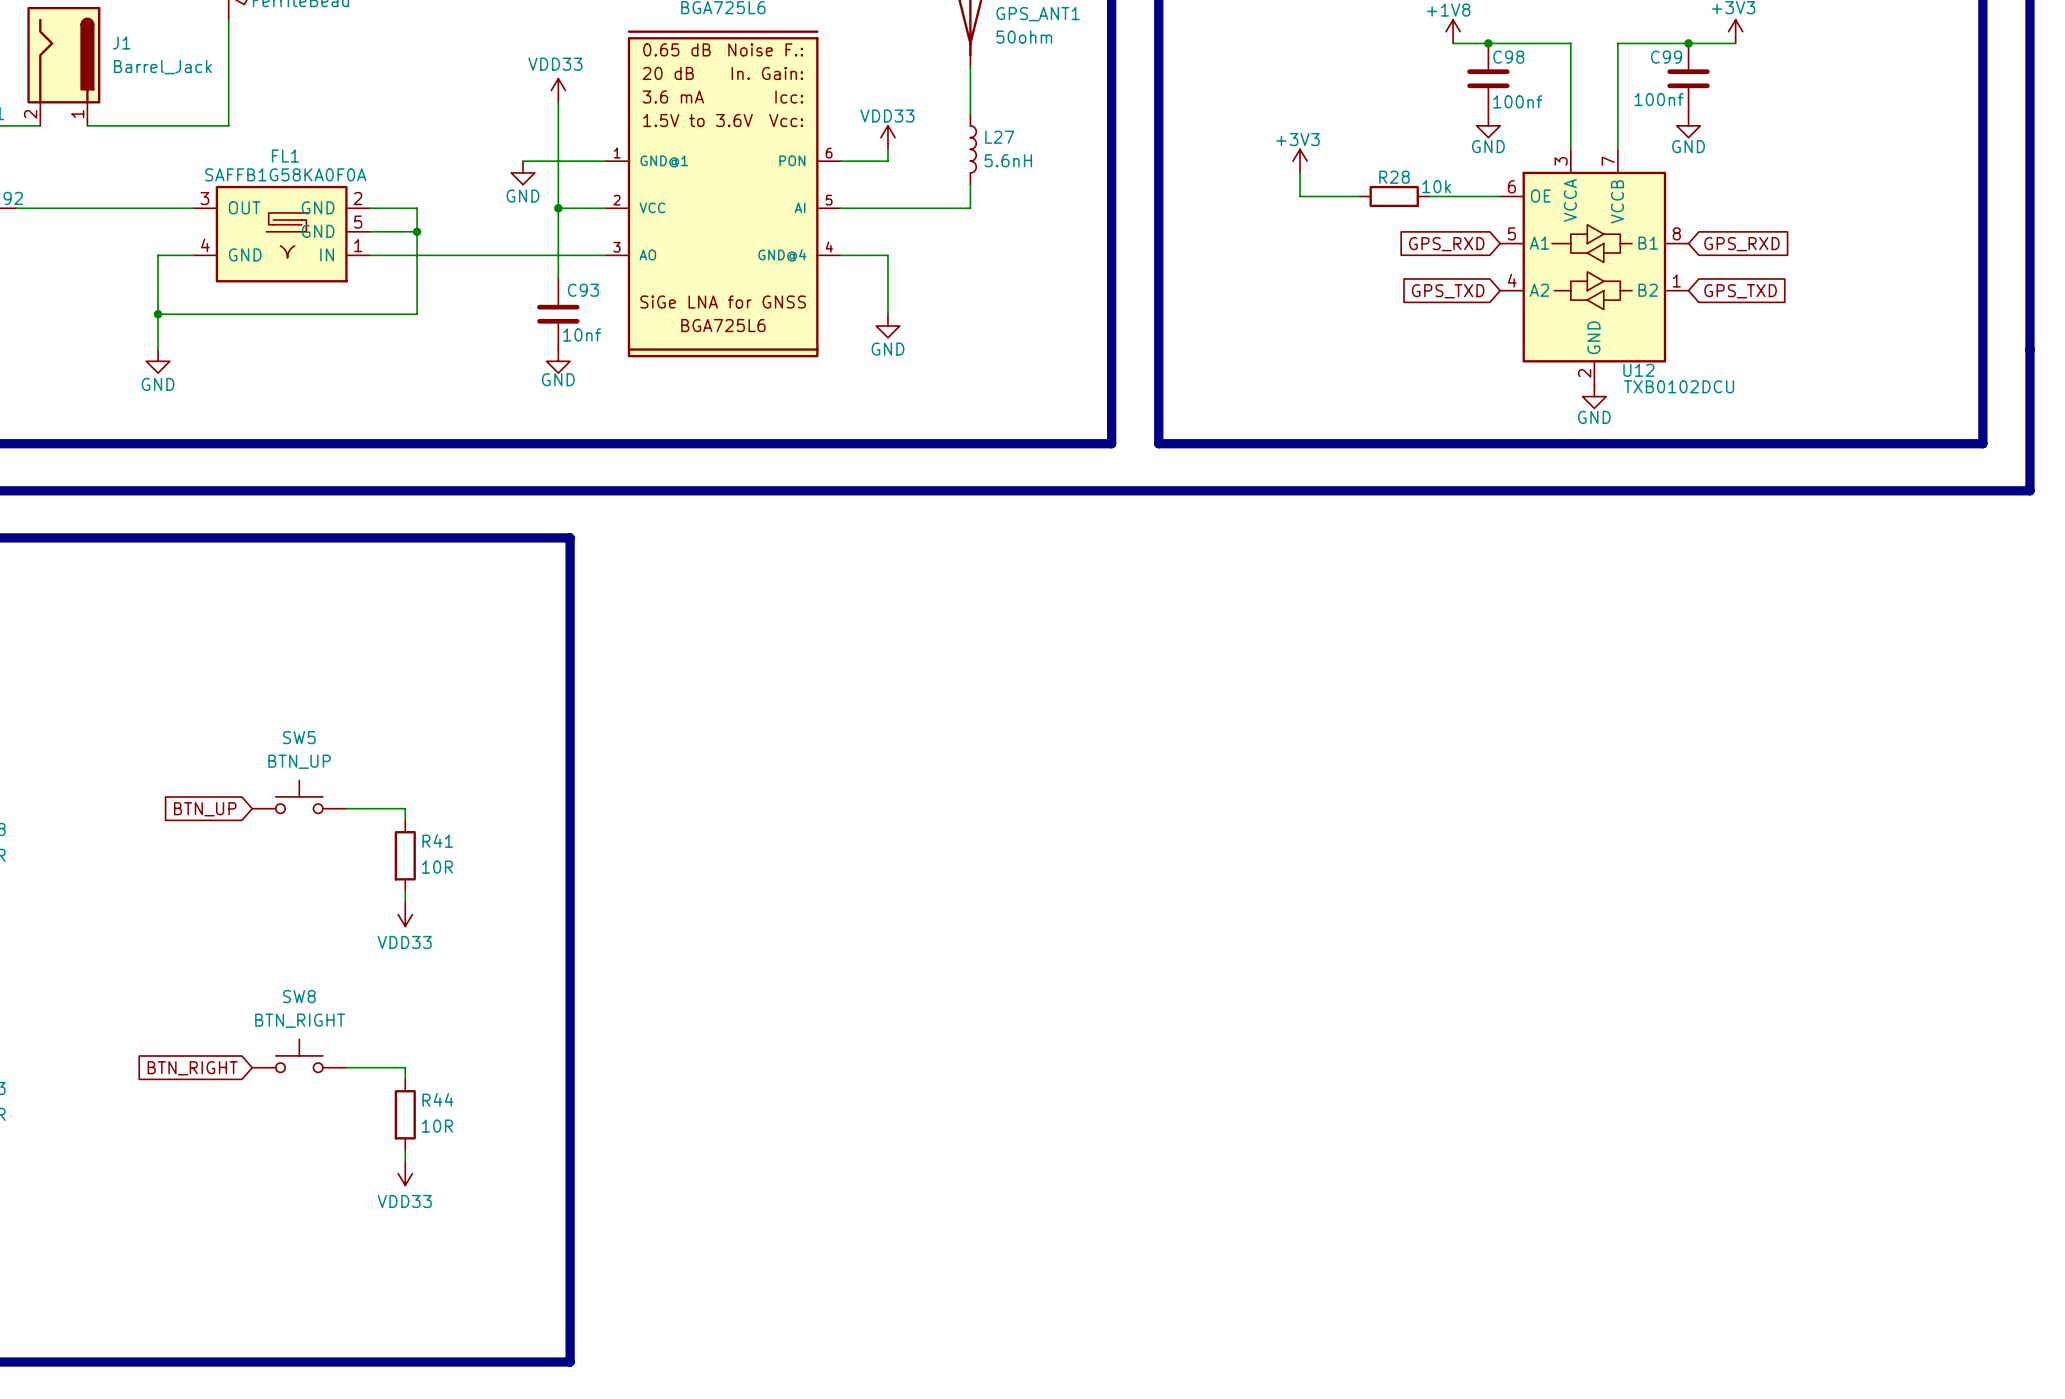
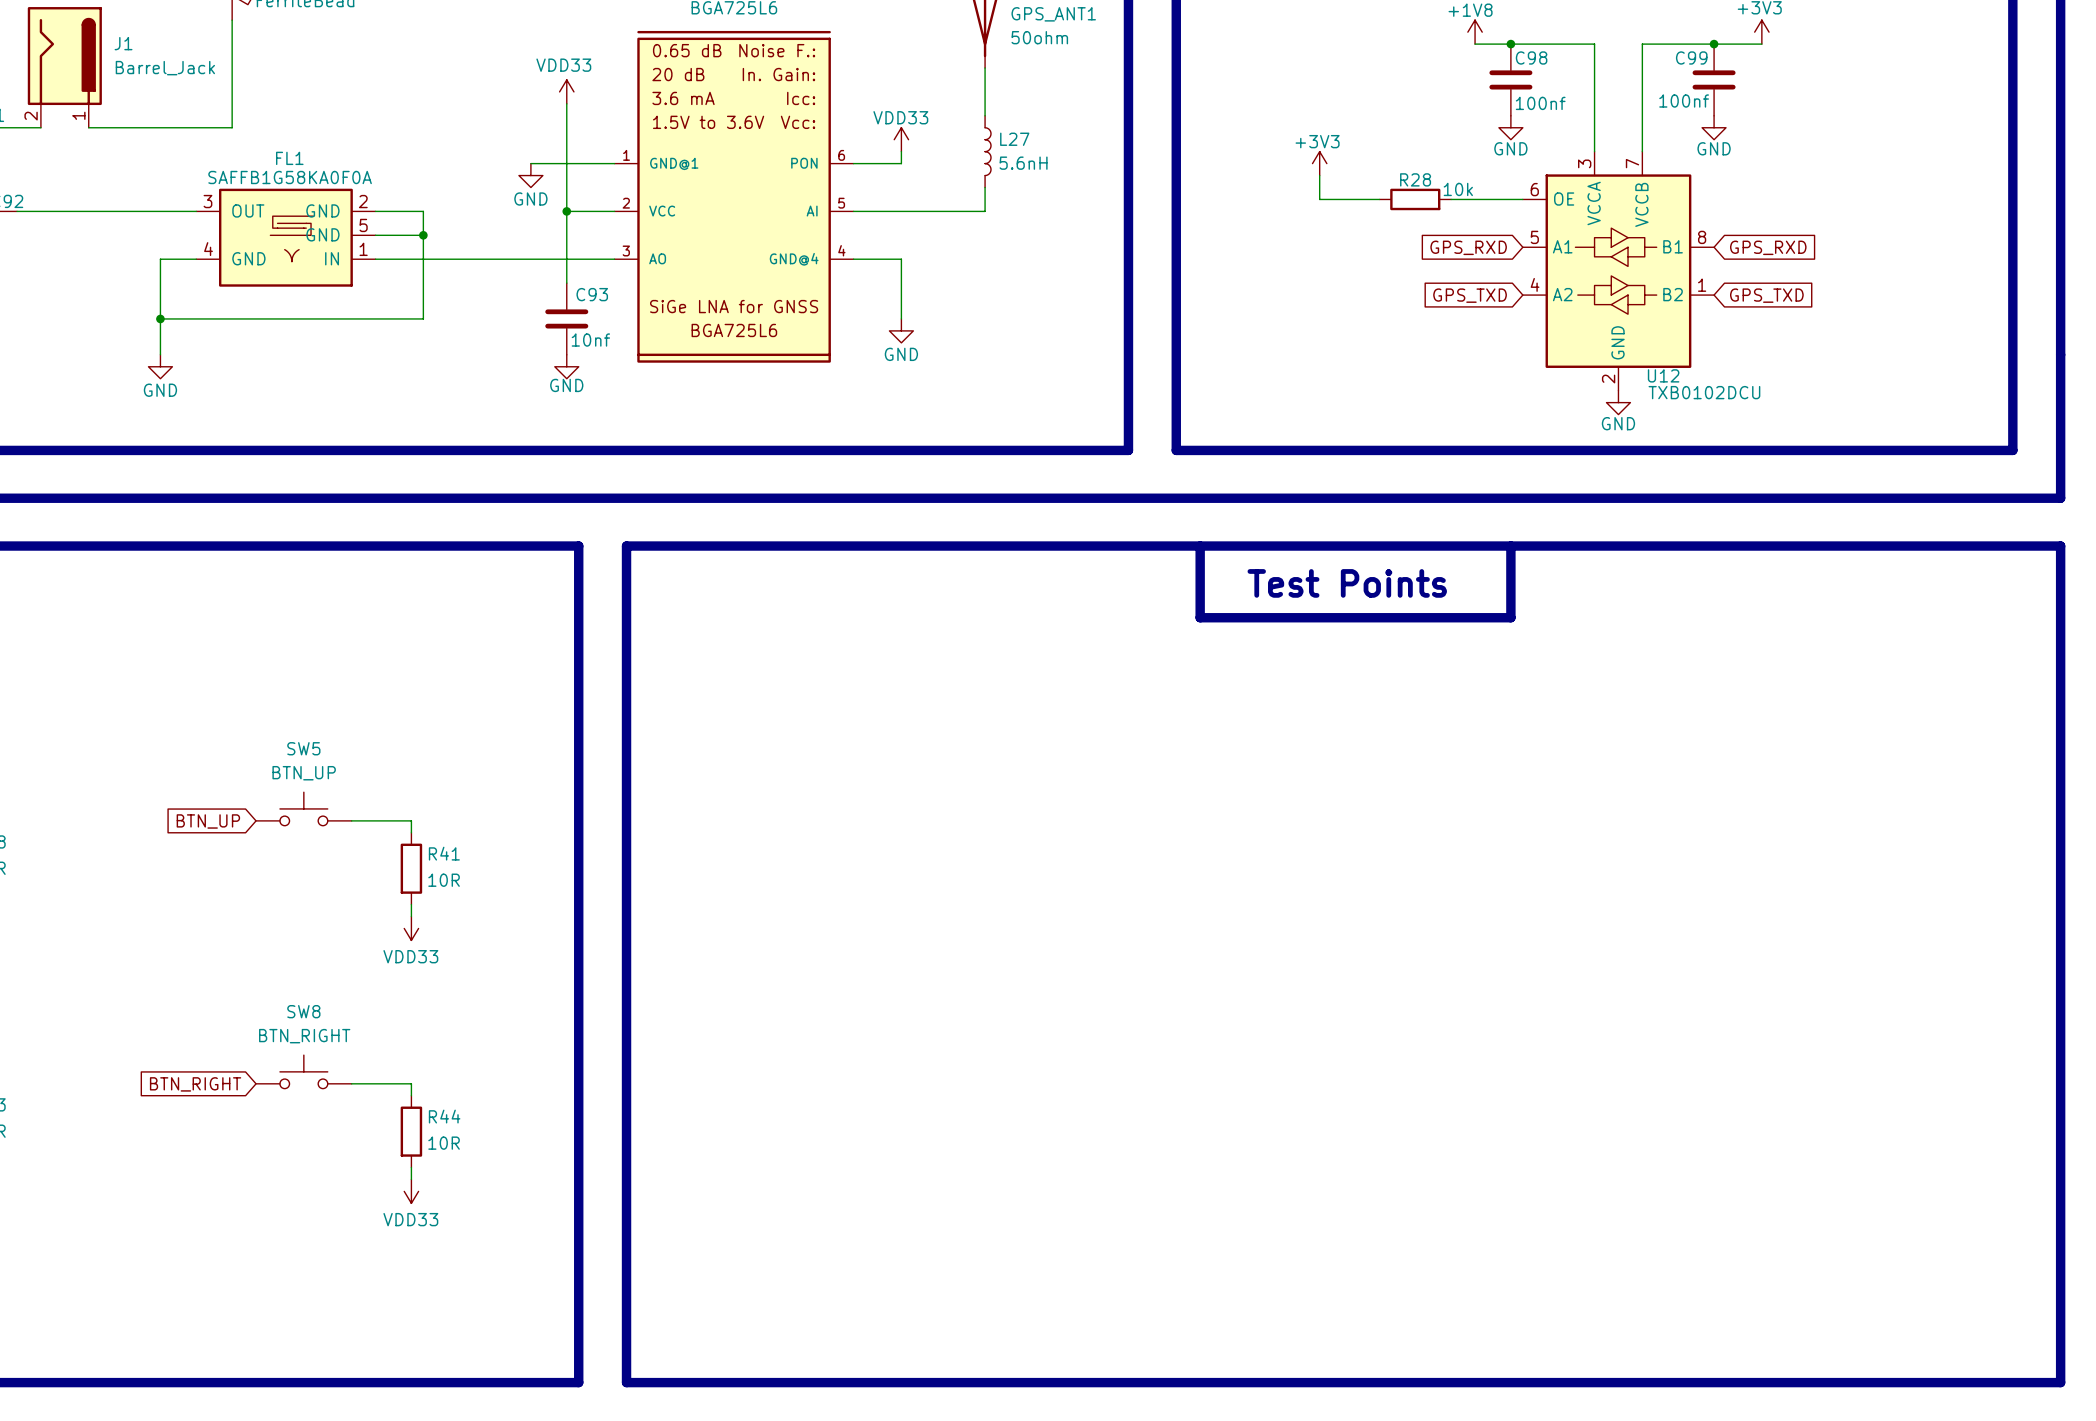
line: none -> (626, 546) (626, 1382) (2060, 1382) (2060, 546) (626, 546)
line: none -> (1200, 546) (1200, 617) (1510, 617) (1510, 546)
text: none -> Test Points (1347, 583)

